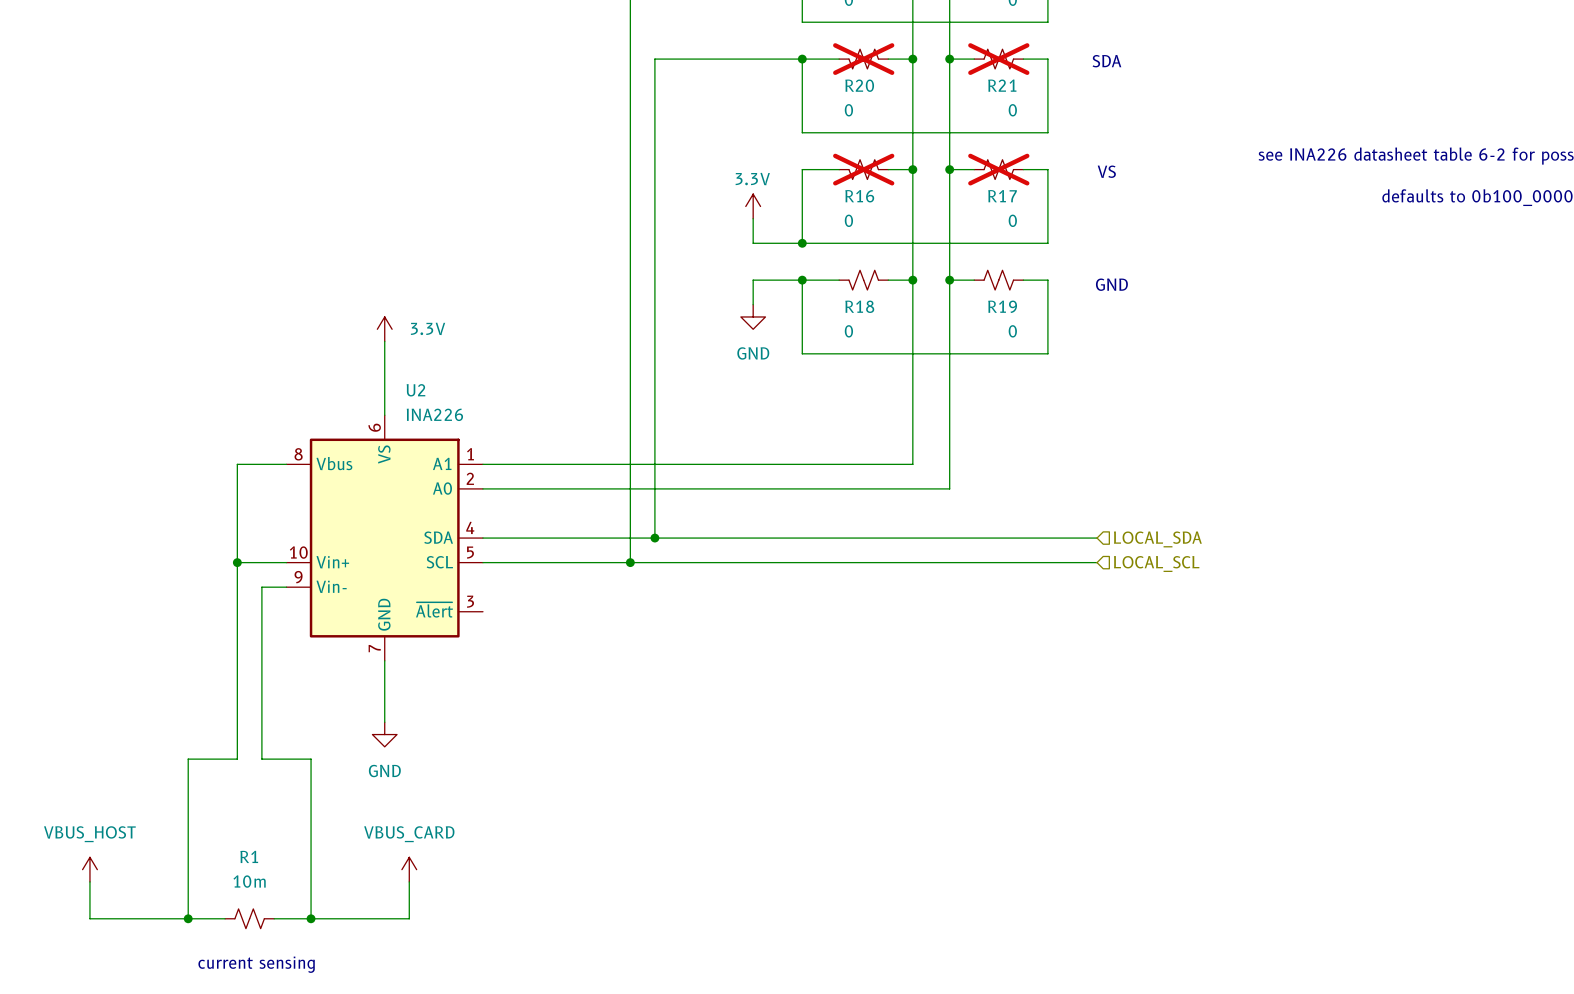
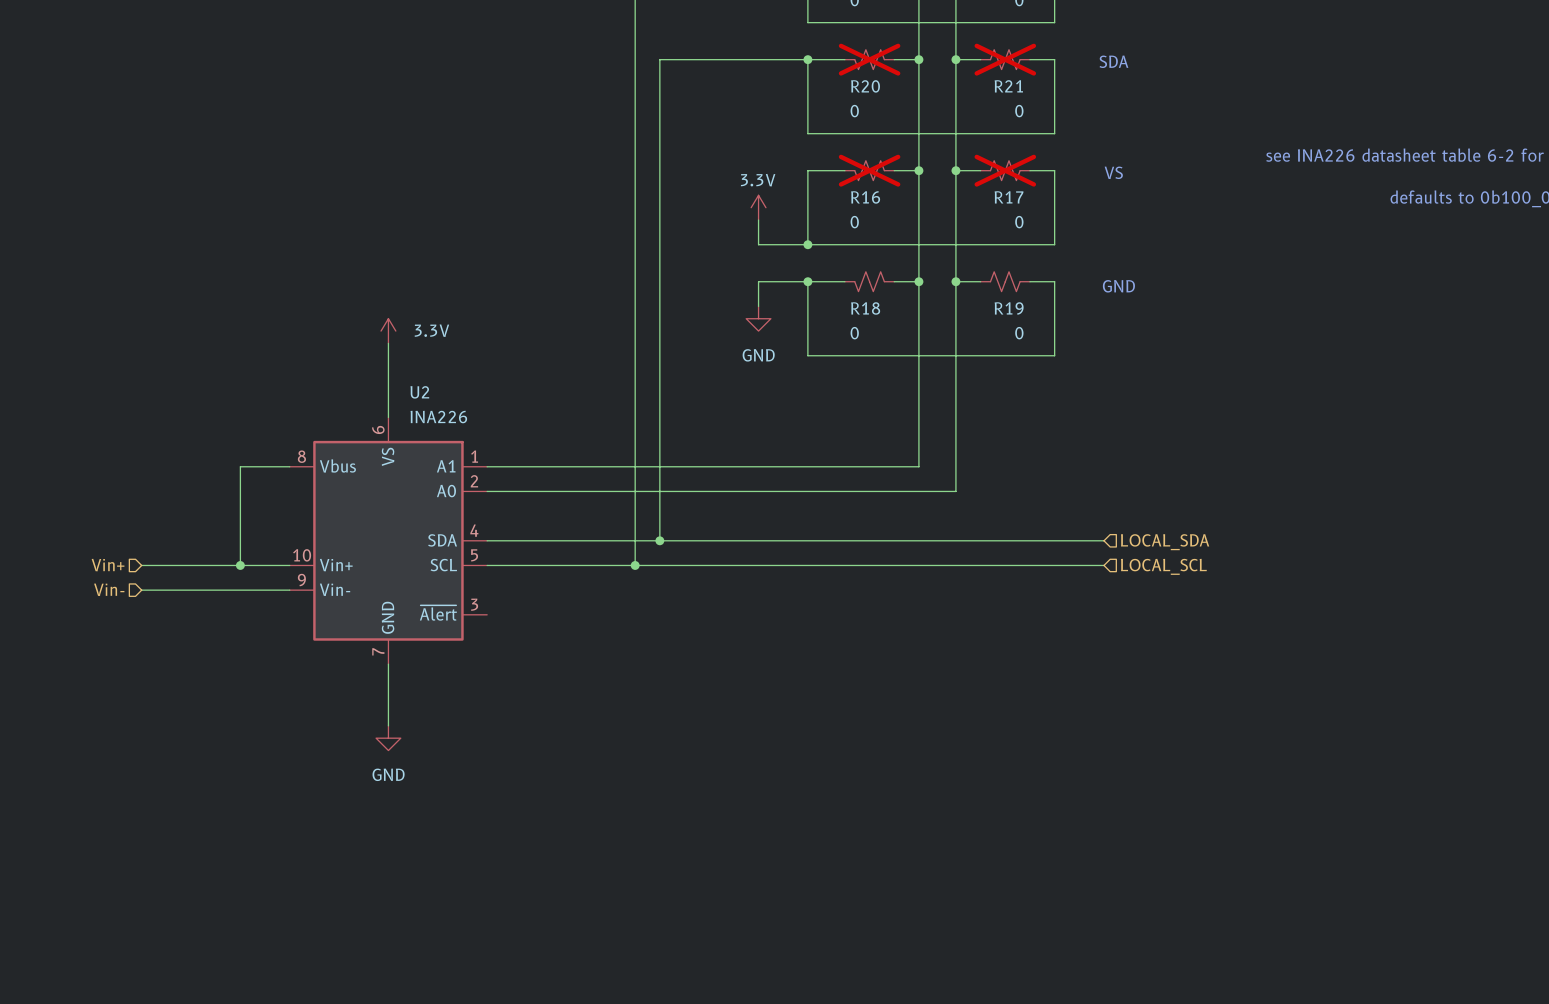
hierarchical label: none -> Vin+ (108, 565)
wire: (237, 562) (237, 759) (188, 759) (188, 918) -> (240, 565) (141, 565)
hierarchical label: none -> Vin- (109, 589)
wire: (261, 587) (261, 759) (311, 759) (311, 918) -> (265, 590) (141, 590)
power symbol: VBUS_HOST (89, 869) -> none
power symbol: VBUS_CARD (409, 869) -> none
wire: (89, 881) (89, 918) (225, 918) -> none
wire: (409, 881) (409, 918) (274, 918) -> none
junction: (188, 918) -> none
R1: 10m (249, 918) -> none
junction: (311, 918) -> none
text: current sensing (256, 964) -> none

